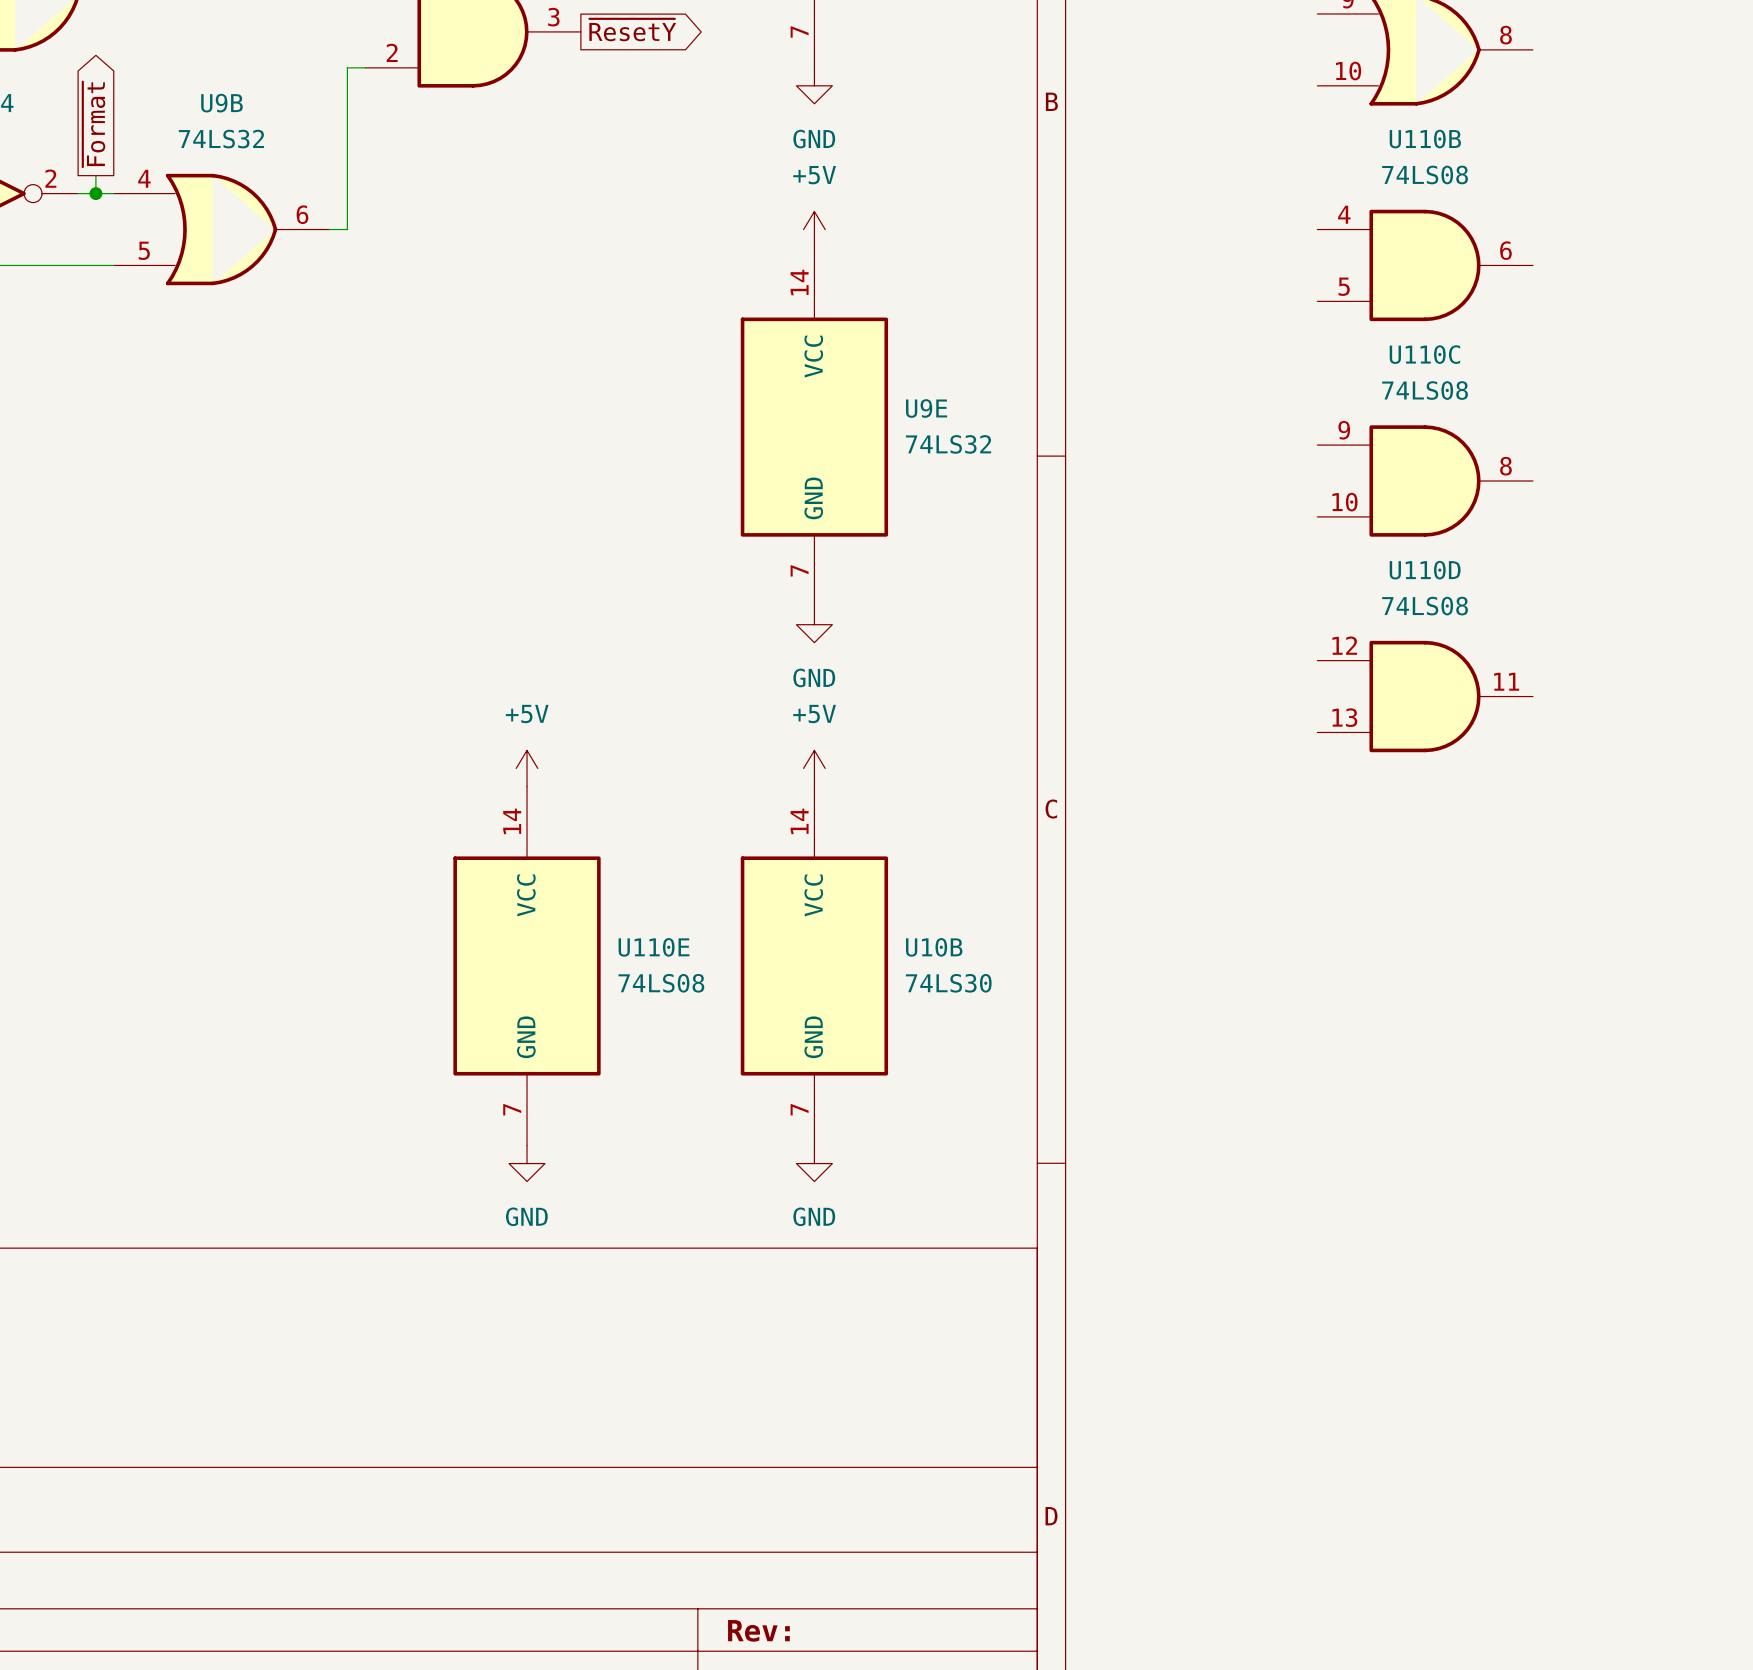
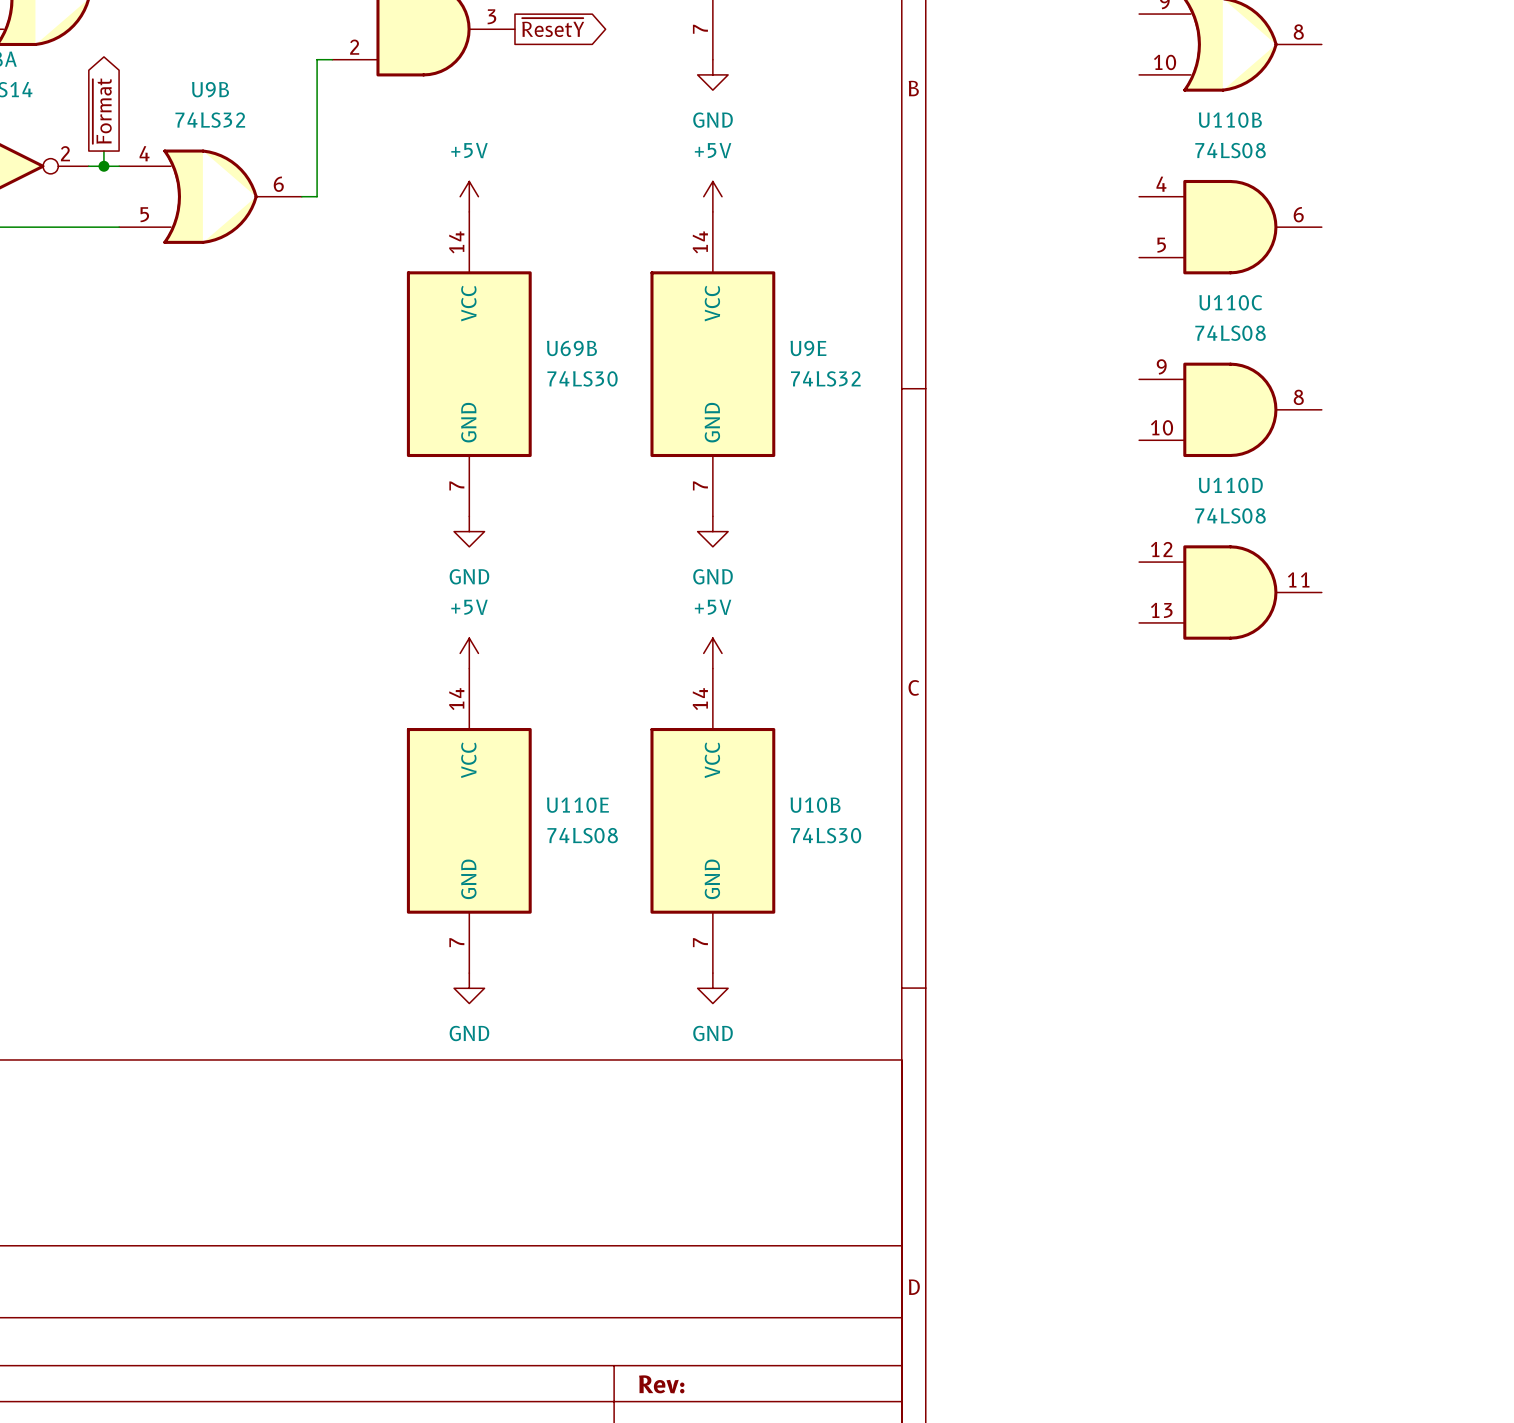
power symbol: none -> +5V (469, 196)
U69B: none -> 74LS30 (469, 364)
power symbol: none -> GND (469, 531)

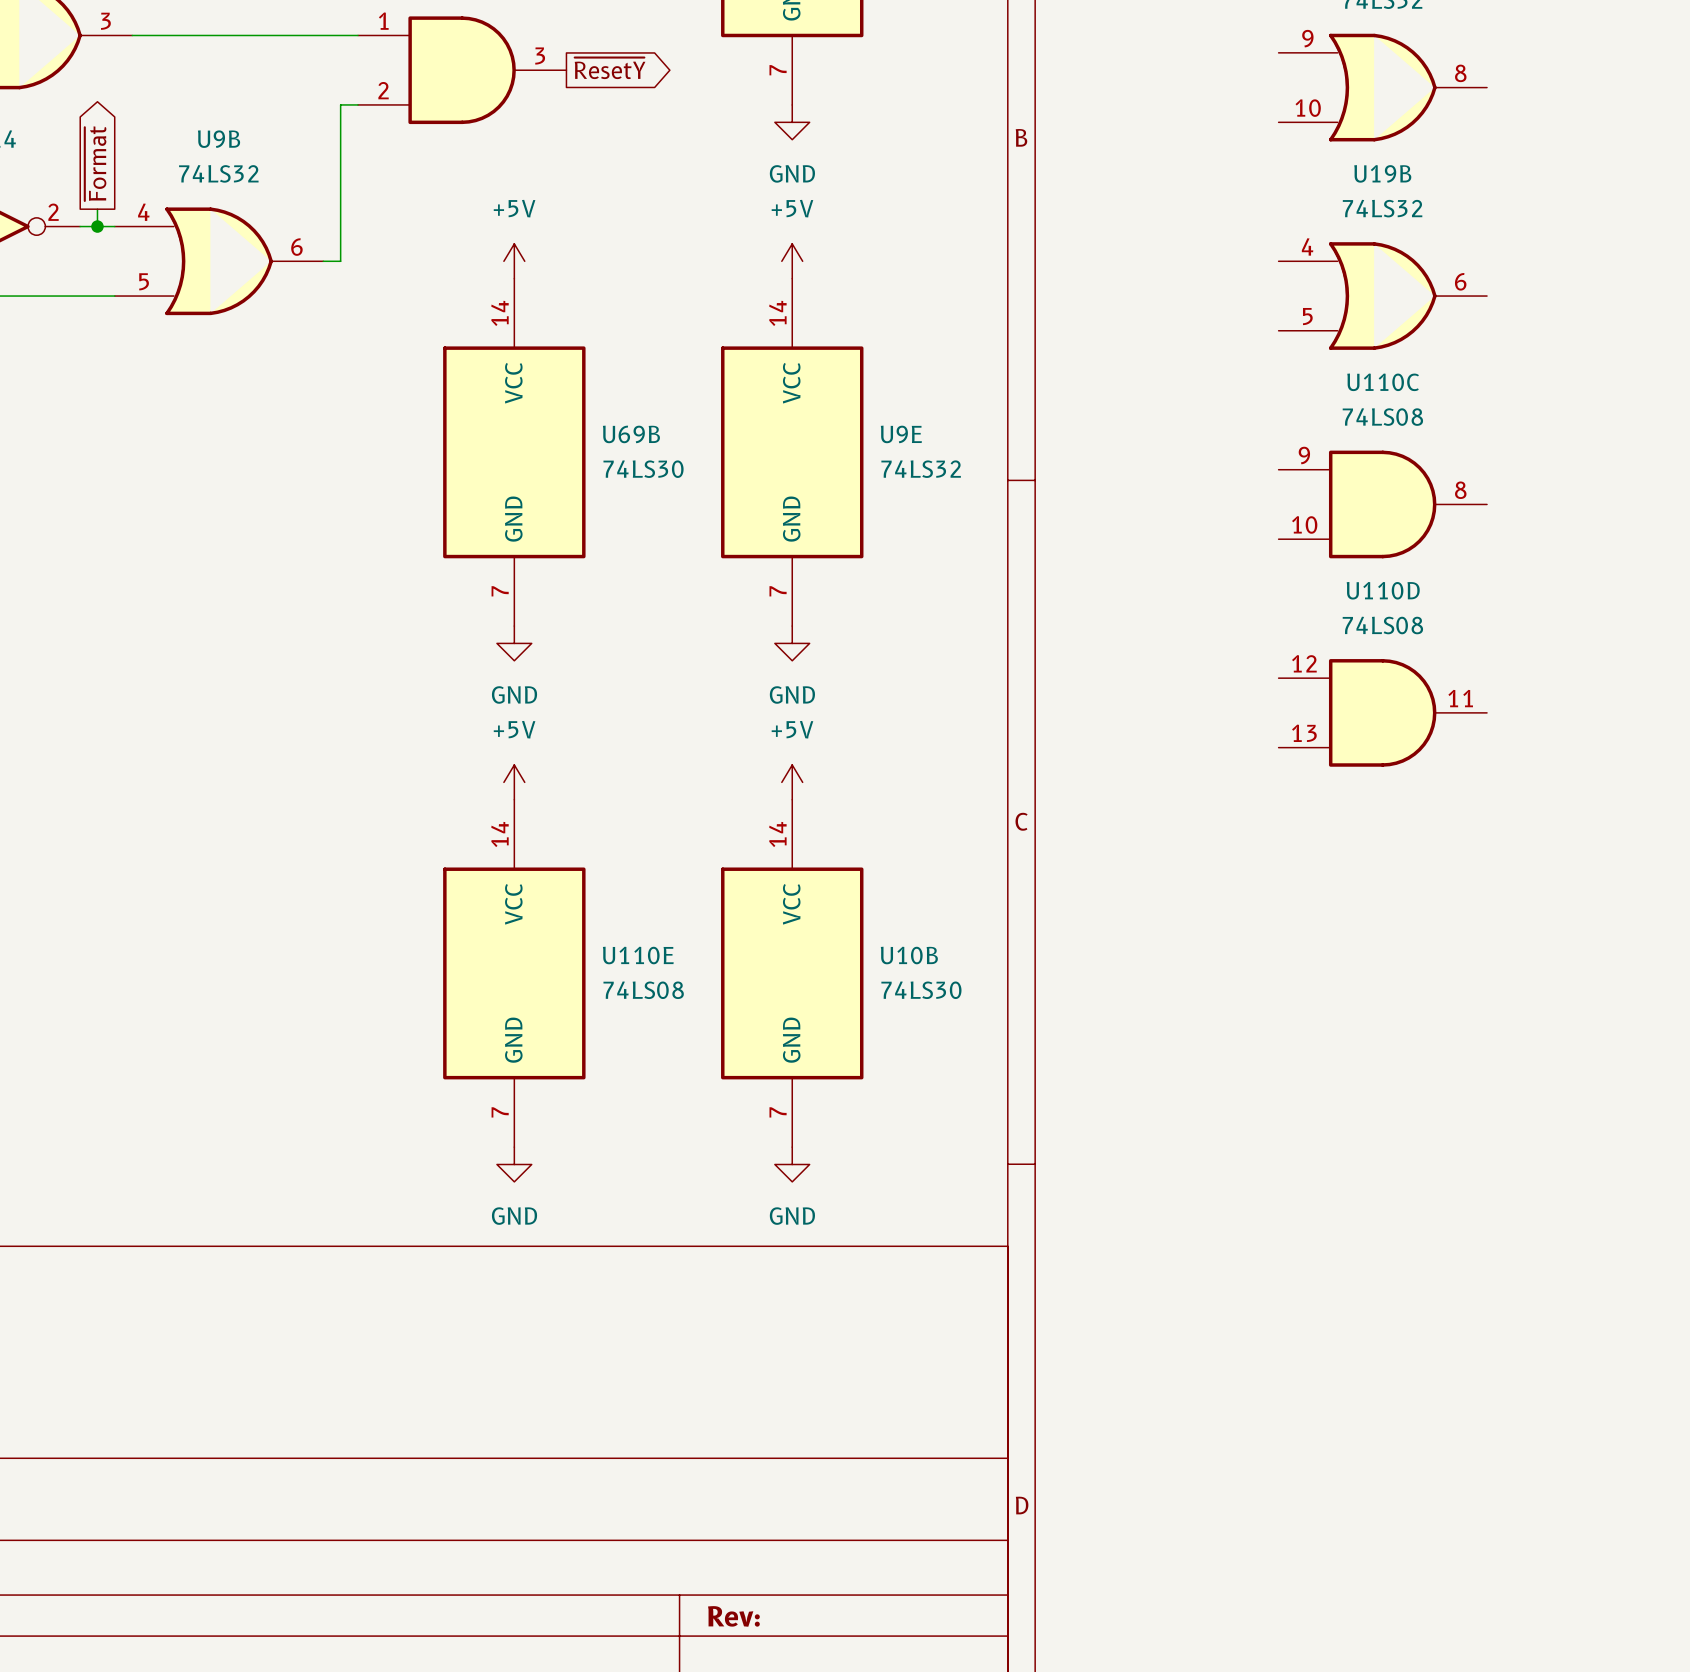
U110B: 74LS08 (1230, 227) -> none
U19B: none -> 74LS32 (1382, 296)

